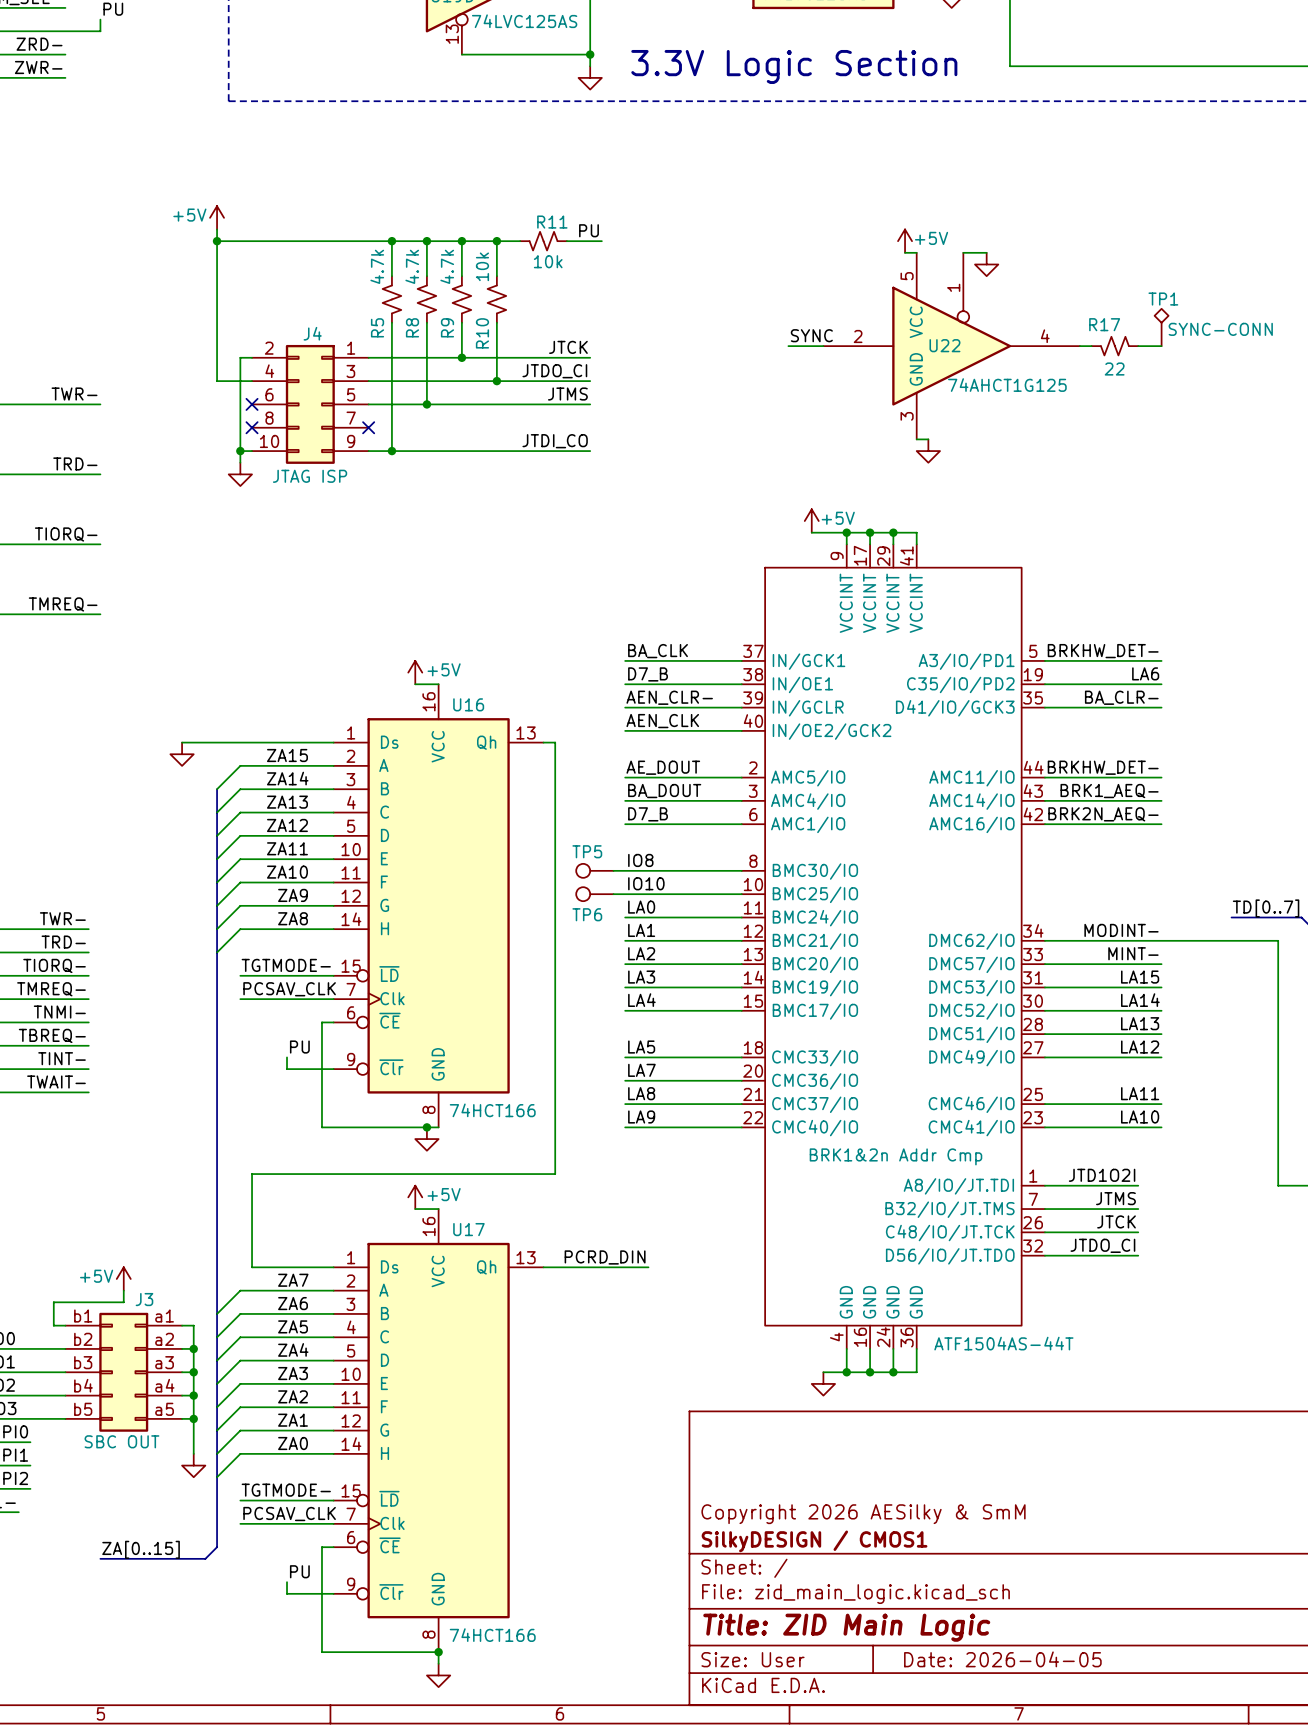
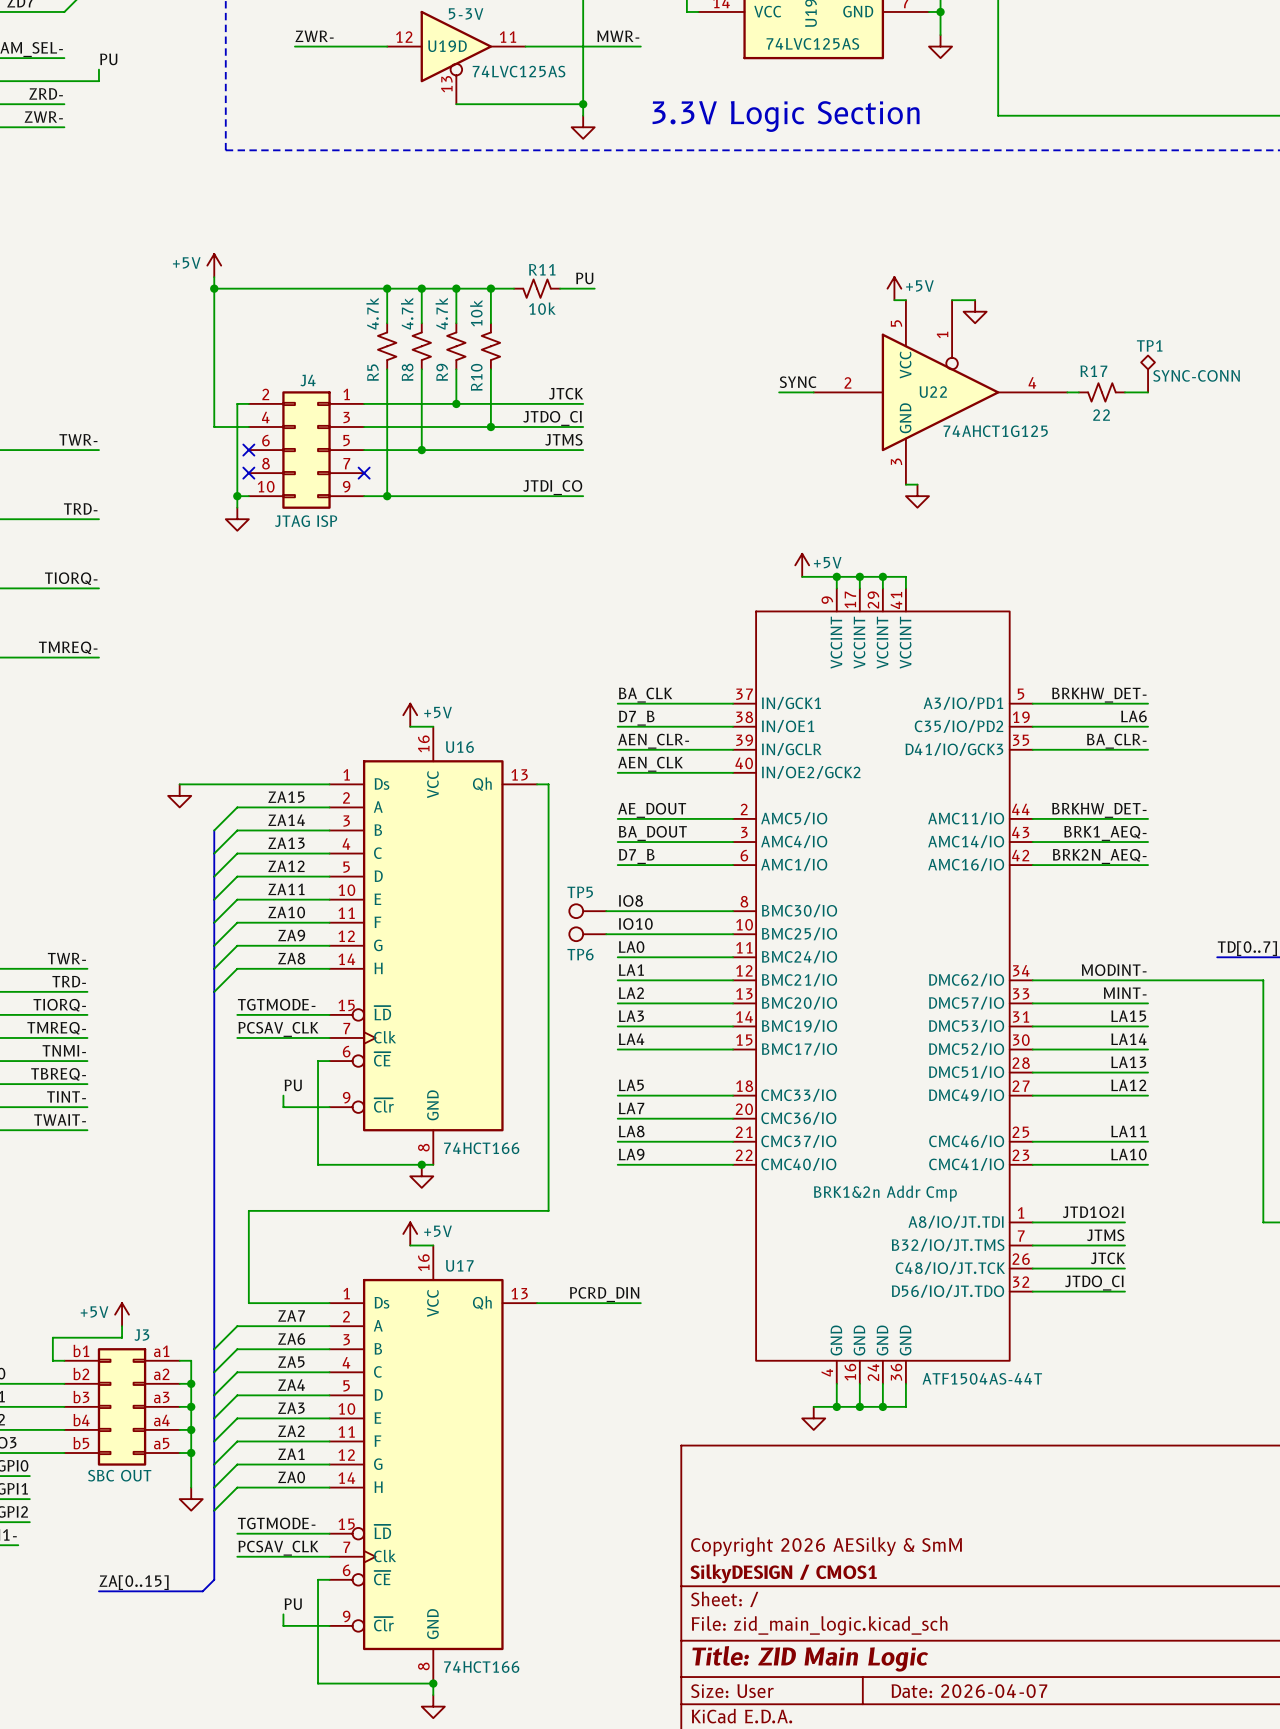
title block: Date: 2026-04-05 (1002, 1659) -> Date: 2026-04-07 (969, 1691)

